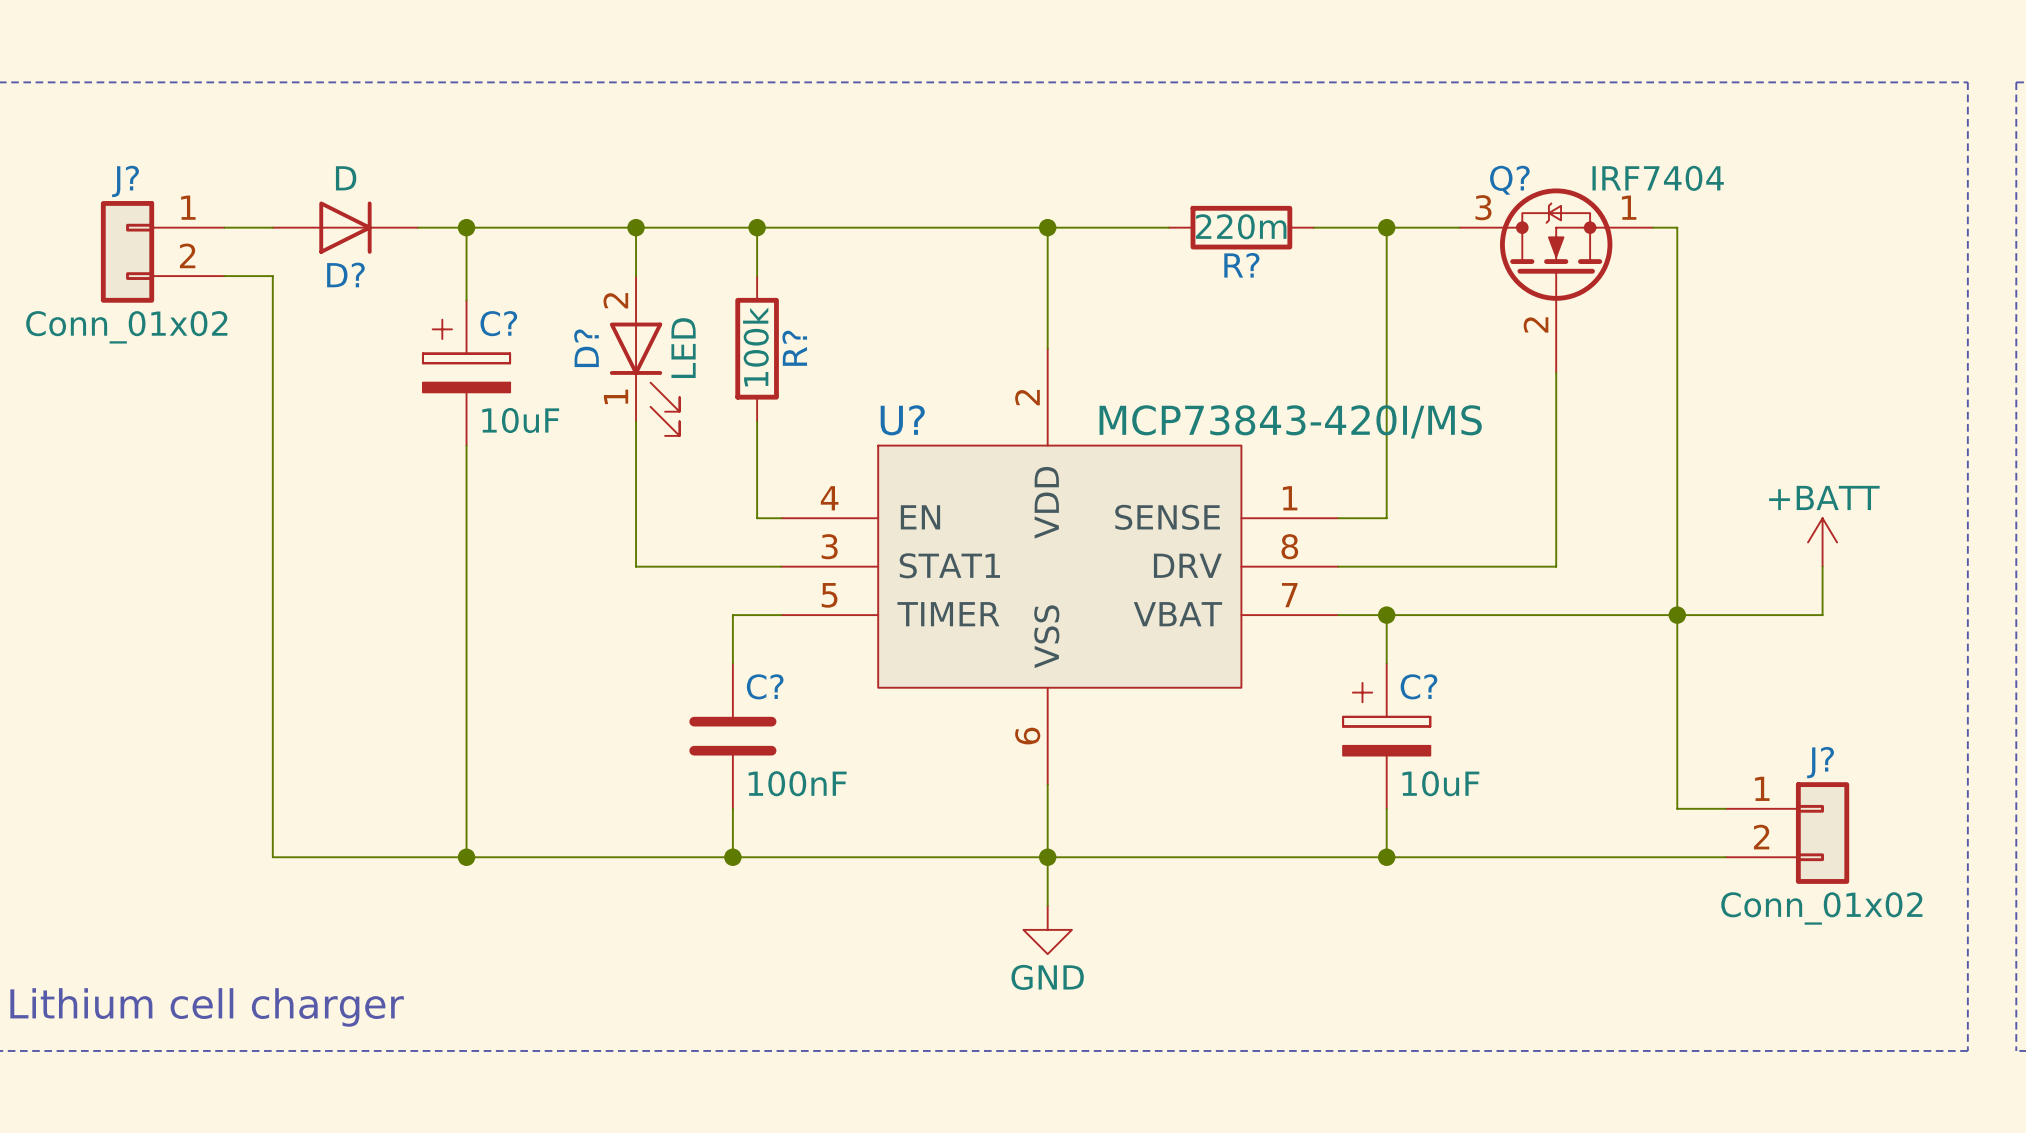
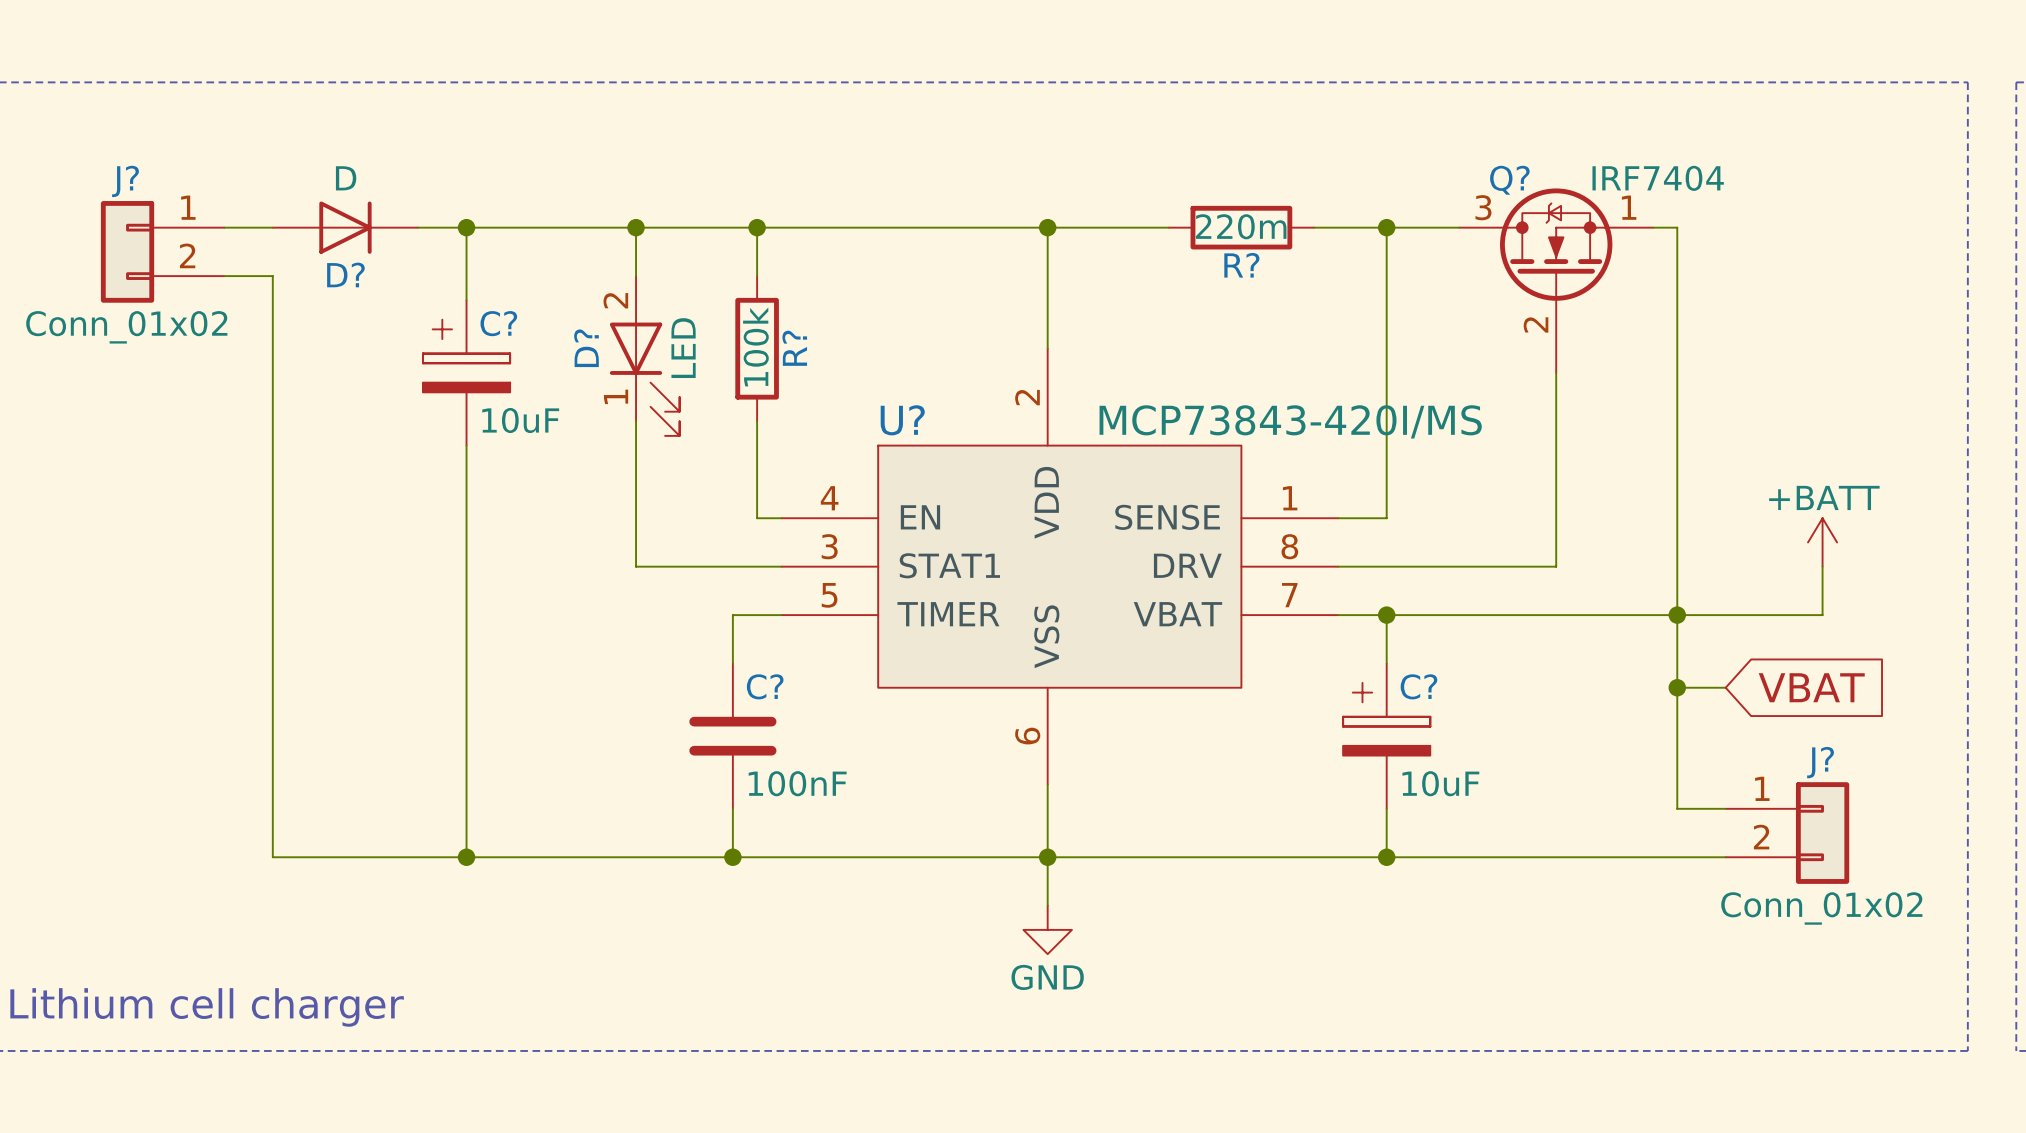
wire: none -> (1677, 687) (1725, 687)
junction: none -> (1677, 687)
global label: none -> VBAT (1811, 687)

